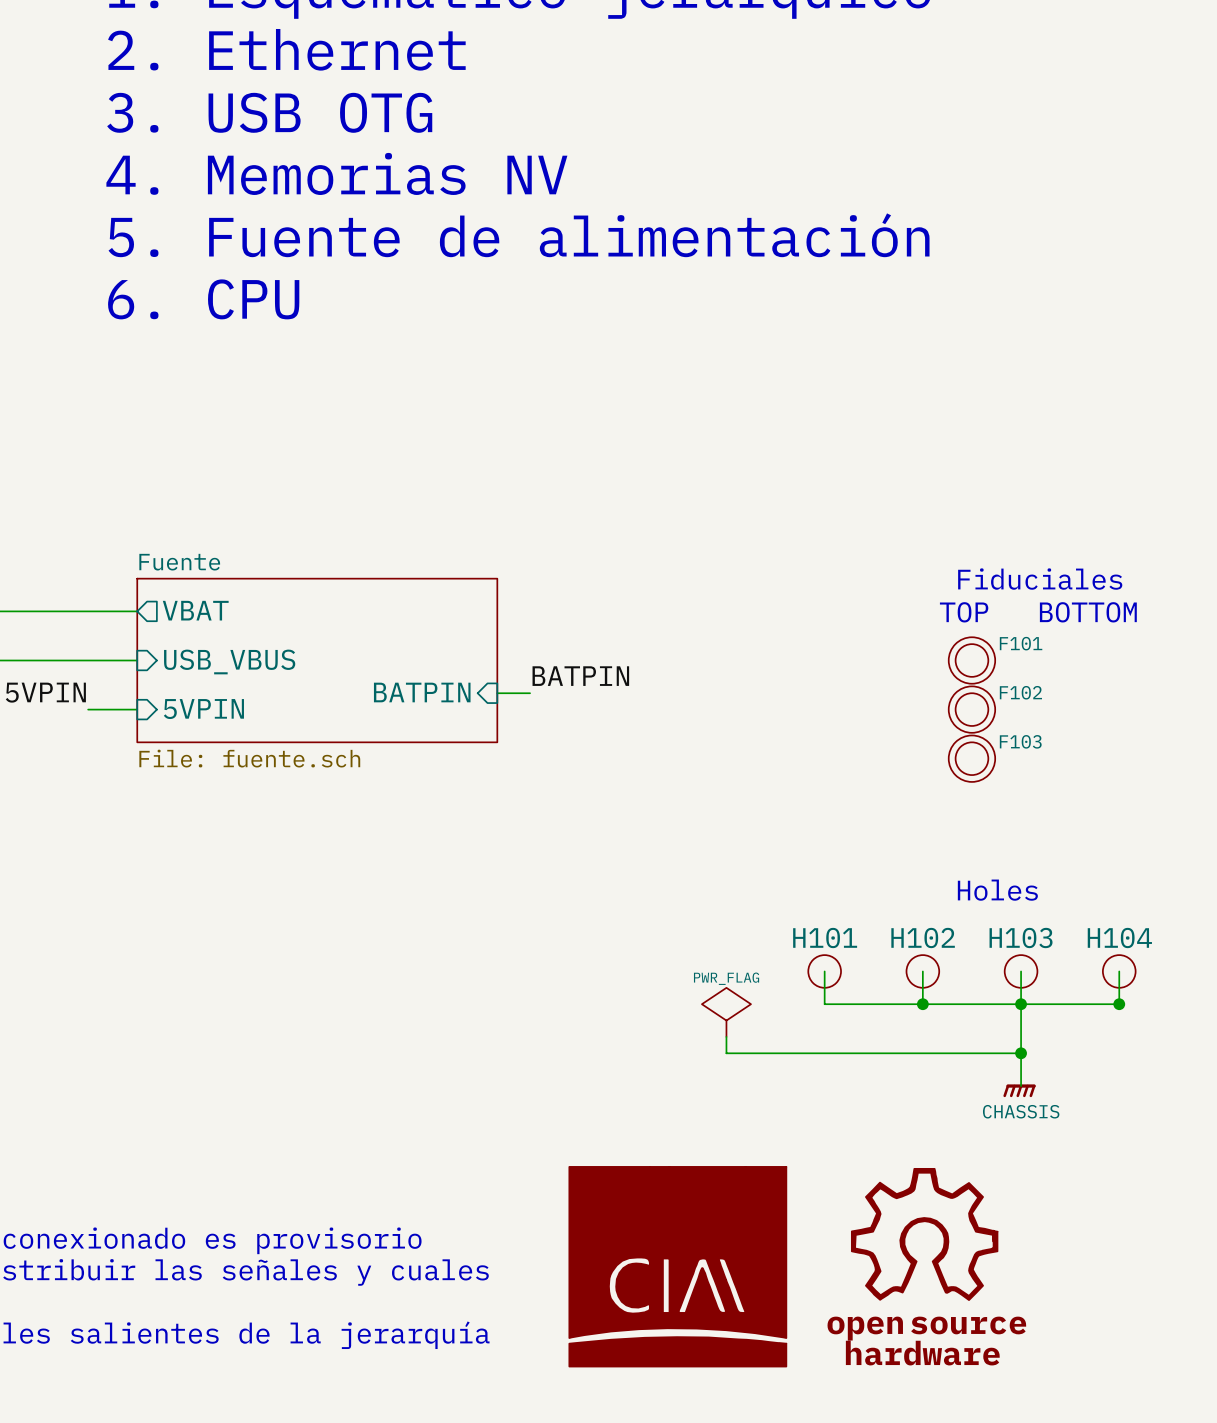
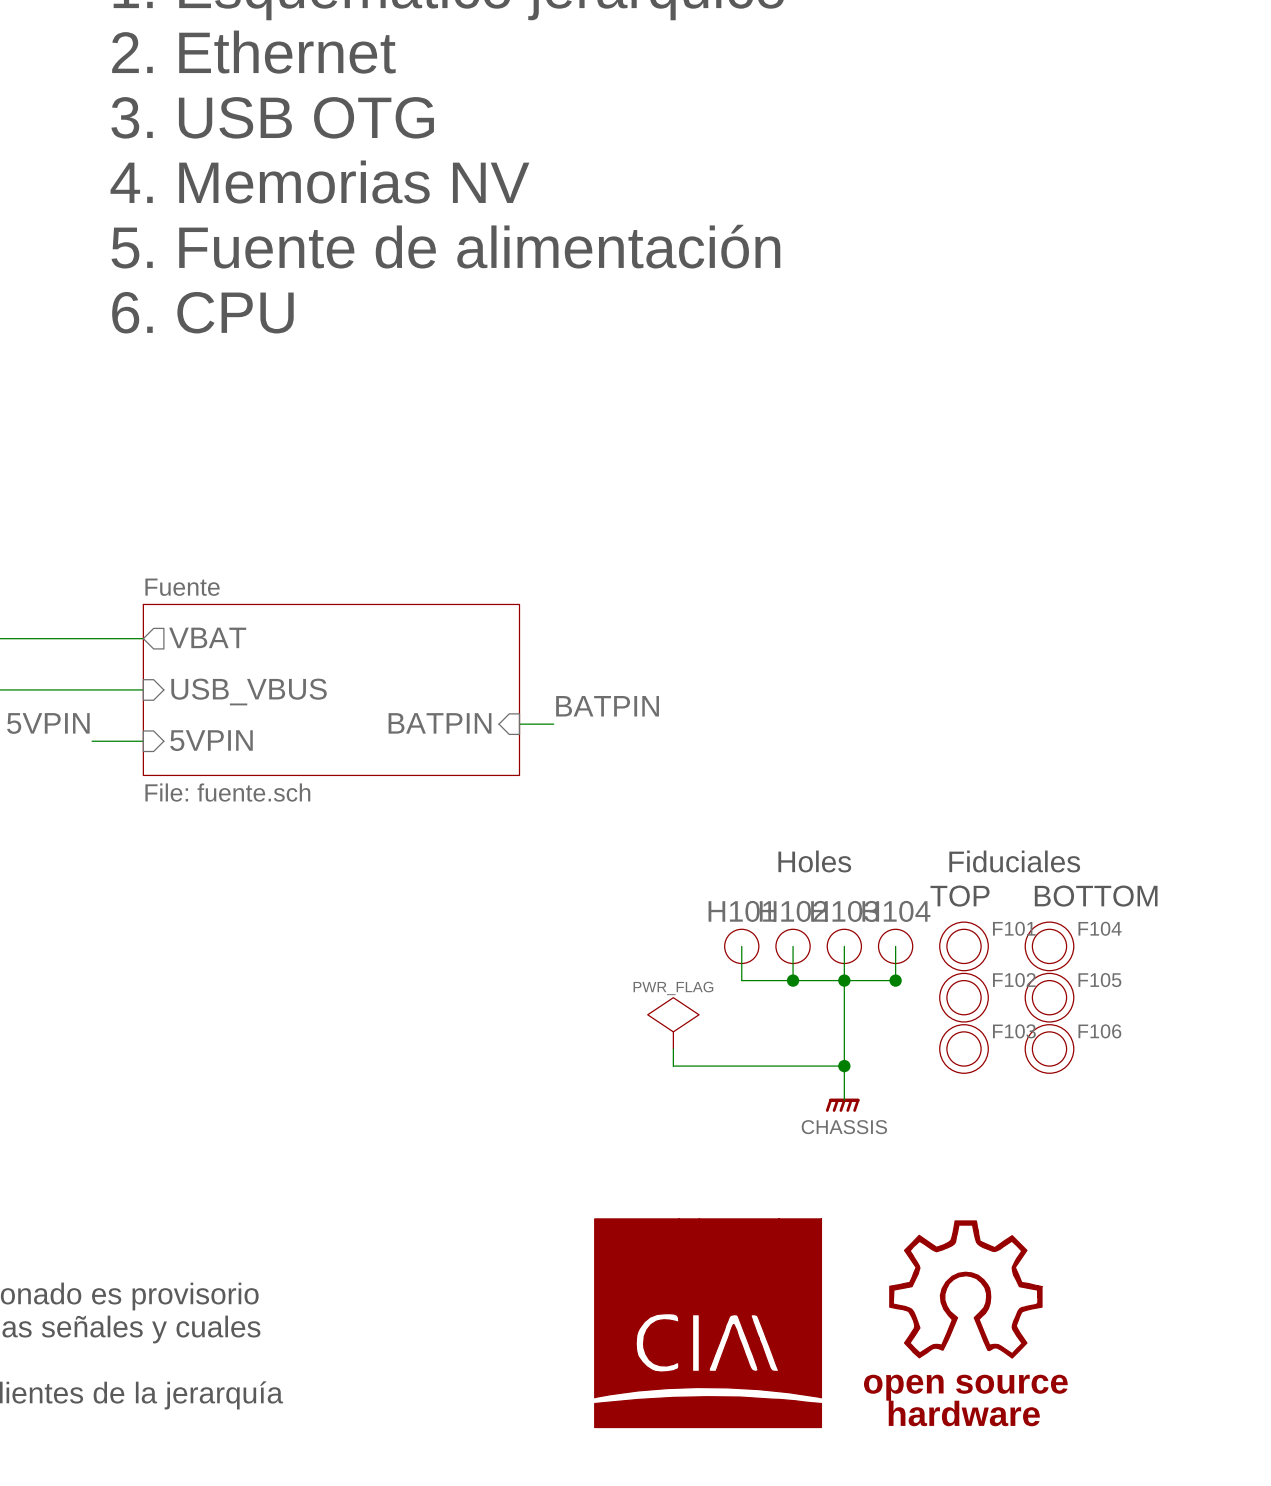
text position: Fiduciales (1040, 579) -> Fiduciales (1014, 861)
text position: TOP (964, 612) -> TOP (960, 896)
text position: BOTTOM (1088, 612) -> BOTTOM (1096, 896)
F101 position: (971, 660) -> (964, 946)
F102 position: (971, 709) -> (964, 997)
F103 position: (971, 758) -> (964, 1048)
text position: Holes (997, 890) -> Holes (814, 861)
wire: none -> (741, 946) (741, 980) (895, 980) (895, 946)
wire: none -> (844, 946) (844, 1100)
F104: none -> (1049, 946)
junction: none -> (793, 980)
junction: none -> (844, 980)
junction: none -> (895, 980)
F105: none -> (1049, 997)
wire: (824, 971) (824, 1004) (1119, 1004) (1119, 971) -> none
H101 position: (824, 971) -> (741, 946)
wire: (922, 971) (922, 1004) -> (793, 946) (793, 980)
H102 position: (922, 971) -> (793, 946)
wire: (1021, 971) (1021, 1086) -> none
H103 position: (1021, 971) -> (844, 946)
H104 position: (1119, 971) -> (895, 946)
wire: none -> (673, 1048) (673, 1066) (844, 1066)
junction: (922, 1004) -> none
F106: none -> (1049, 1048)
junction: (1021, 1004) -> none
junction: (1119, 1004) -> none
power symbol position: PWR_FLAG (726, 1012) -> PWR_FLAG (673, 1023)
junction: none -> (844, 1066)
wire: (726, 1036) (726, 1053) (1021, 1053) -> none
junction: (1021, 1053) -> none
power symbol position: CHASSIS (1019, 1090) -> CHASSIS (842, 1105)

